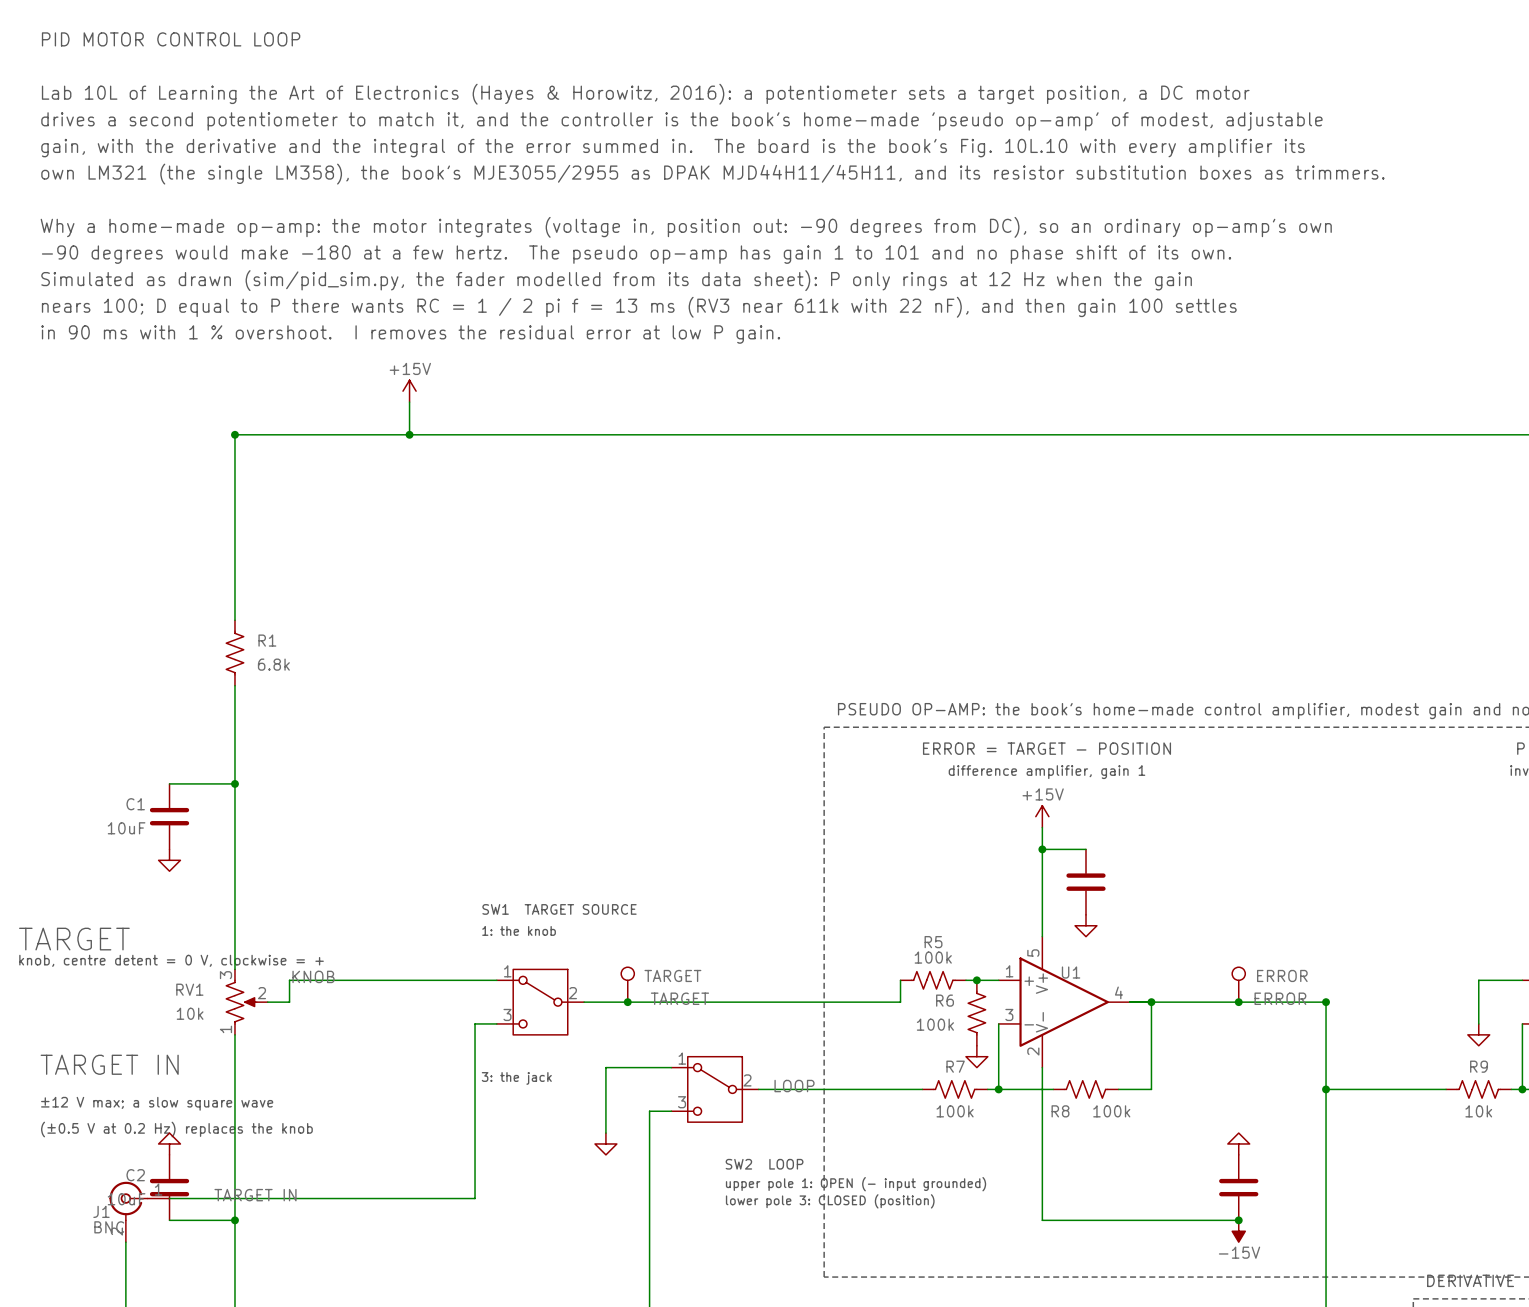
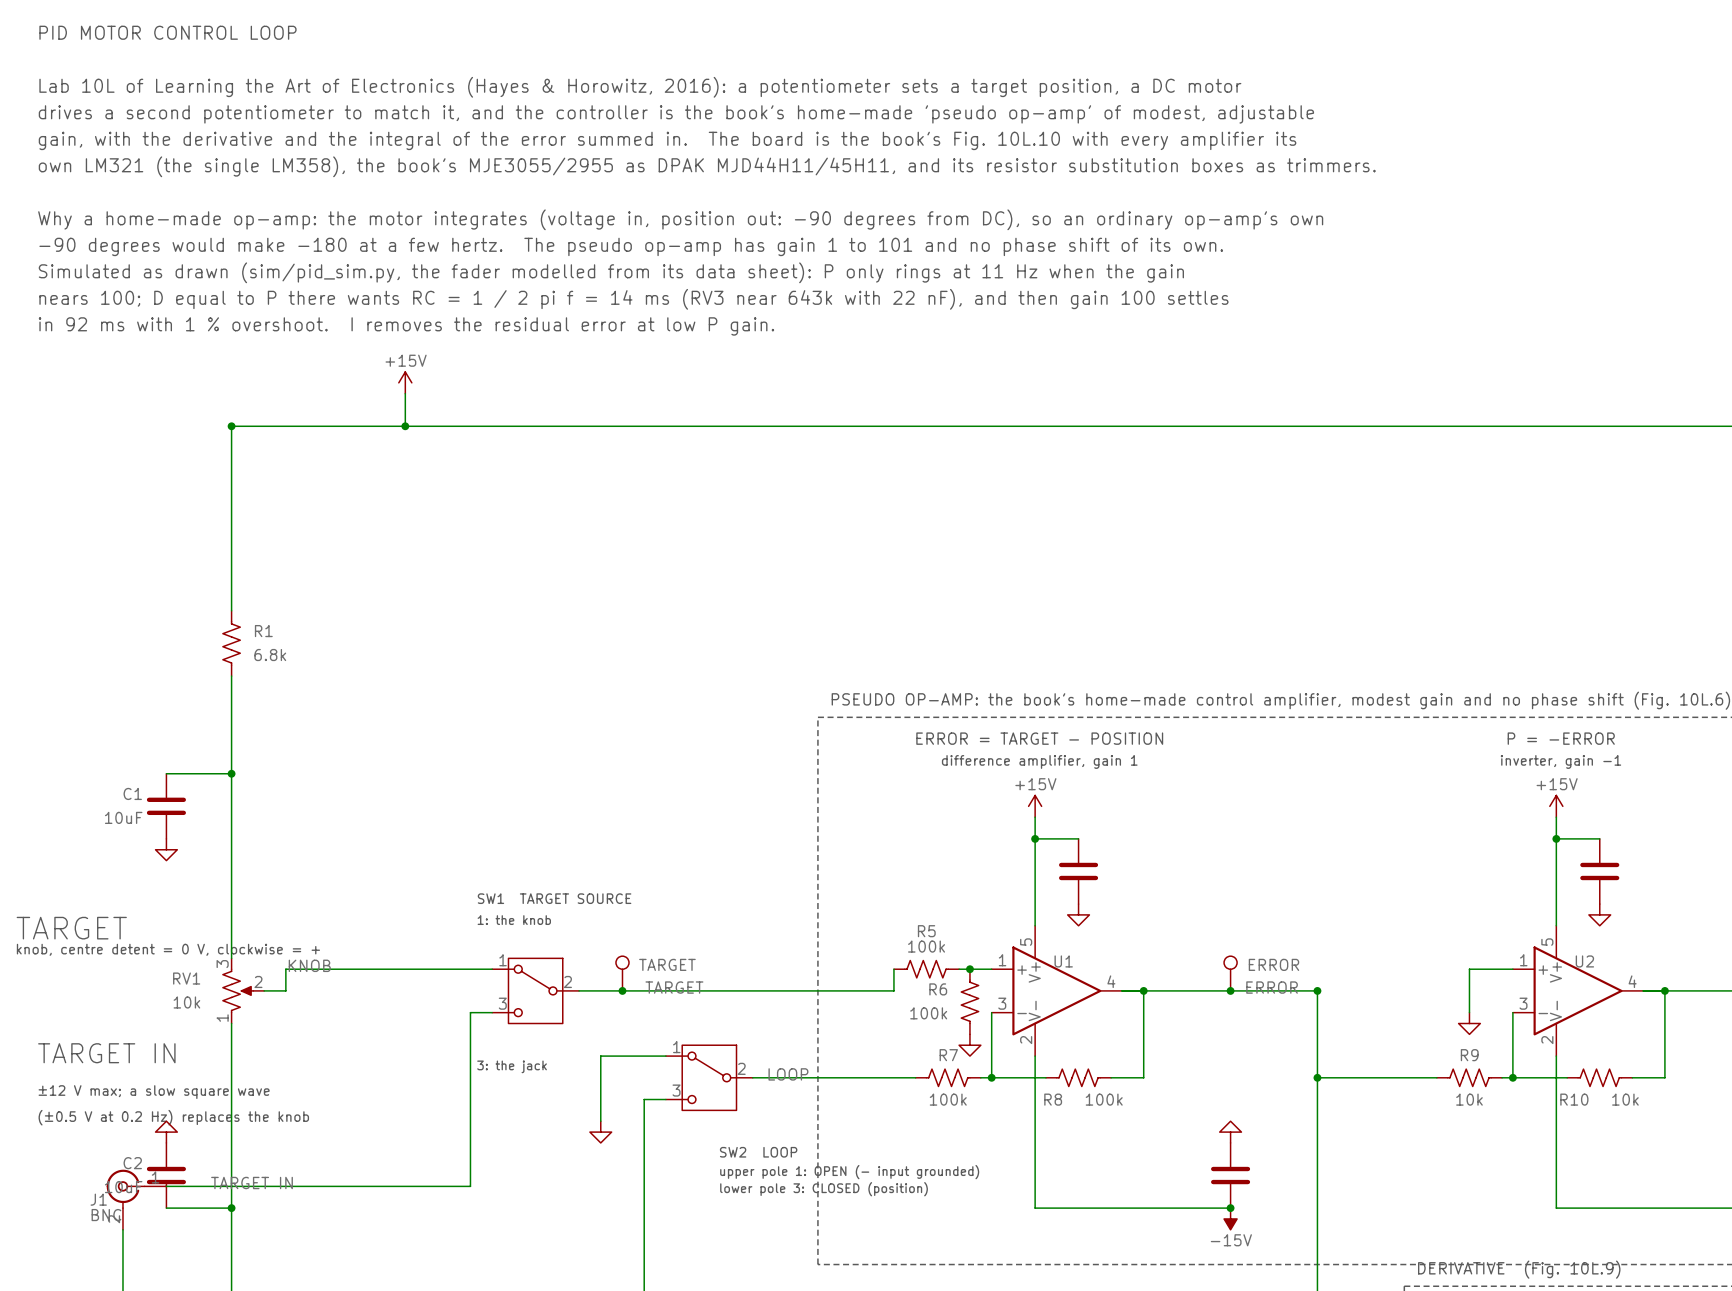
text: Simulated as drawn (sim/pid_sim.py, the fader modelled from its data sheet): P only rings at 12 Hz when the gain (616, 280) -> Simulated as drawn (sim/pid_sim.py, the fader modelled from its data sheet): P only rings at 11 Hz when the gain (611, 272)
text: nears 100; D equal to P there wants RC = 1 / 2 pi f = 13 ms (RV3 near 611k with 22 nF), and then gain 100 settles (639, 307) -> nears 100; D equal to P there wants RC = 1 / 2 pi f = 14 ms (RV3 near 643k with 22 nF), and then gain 100 settles (633, 299)
text: in 90 ms with 1 % overshoot. I removes the residual error at low P gain. (410, 334) -> in 92 ms with 1 % overshoot. I removes the residual error at low P gain. (406, 326)

